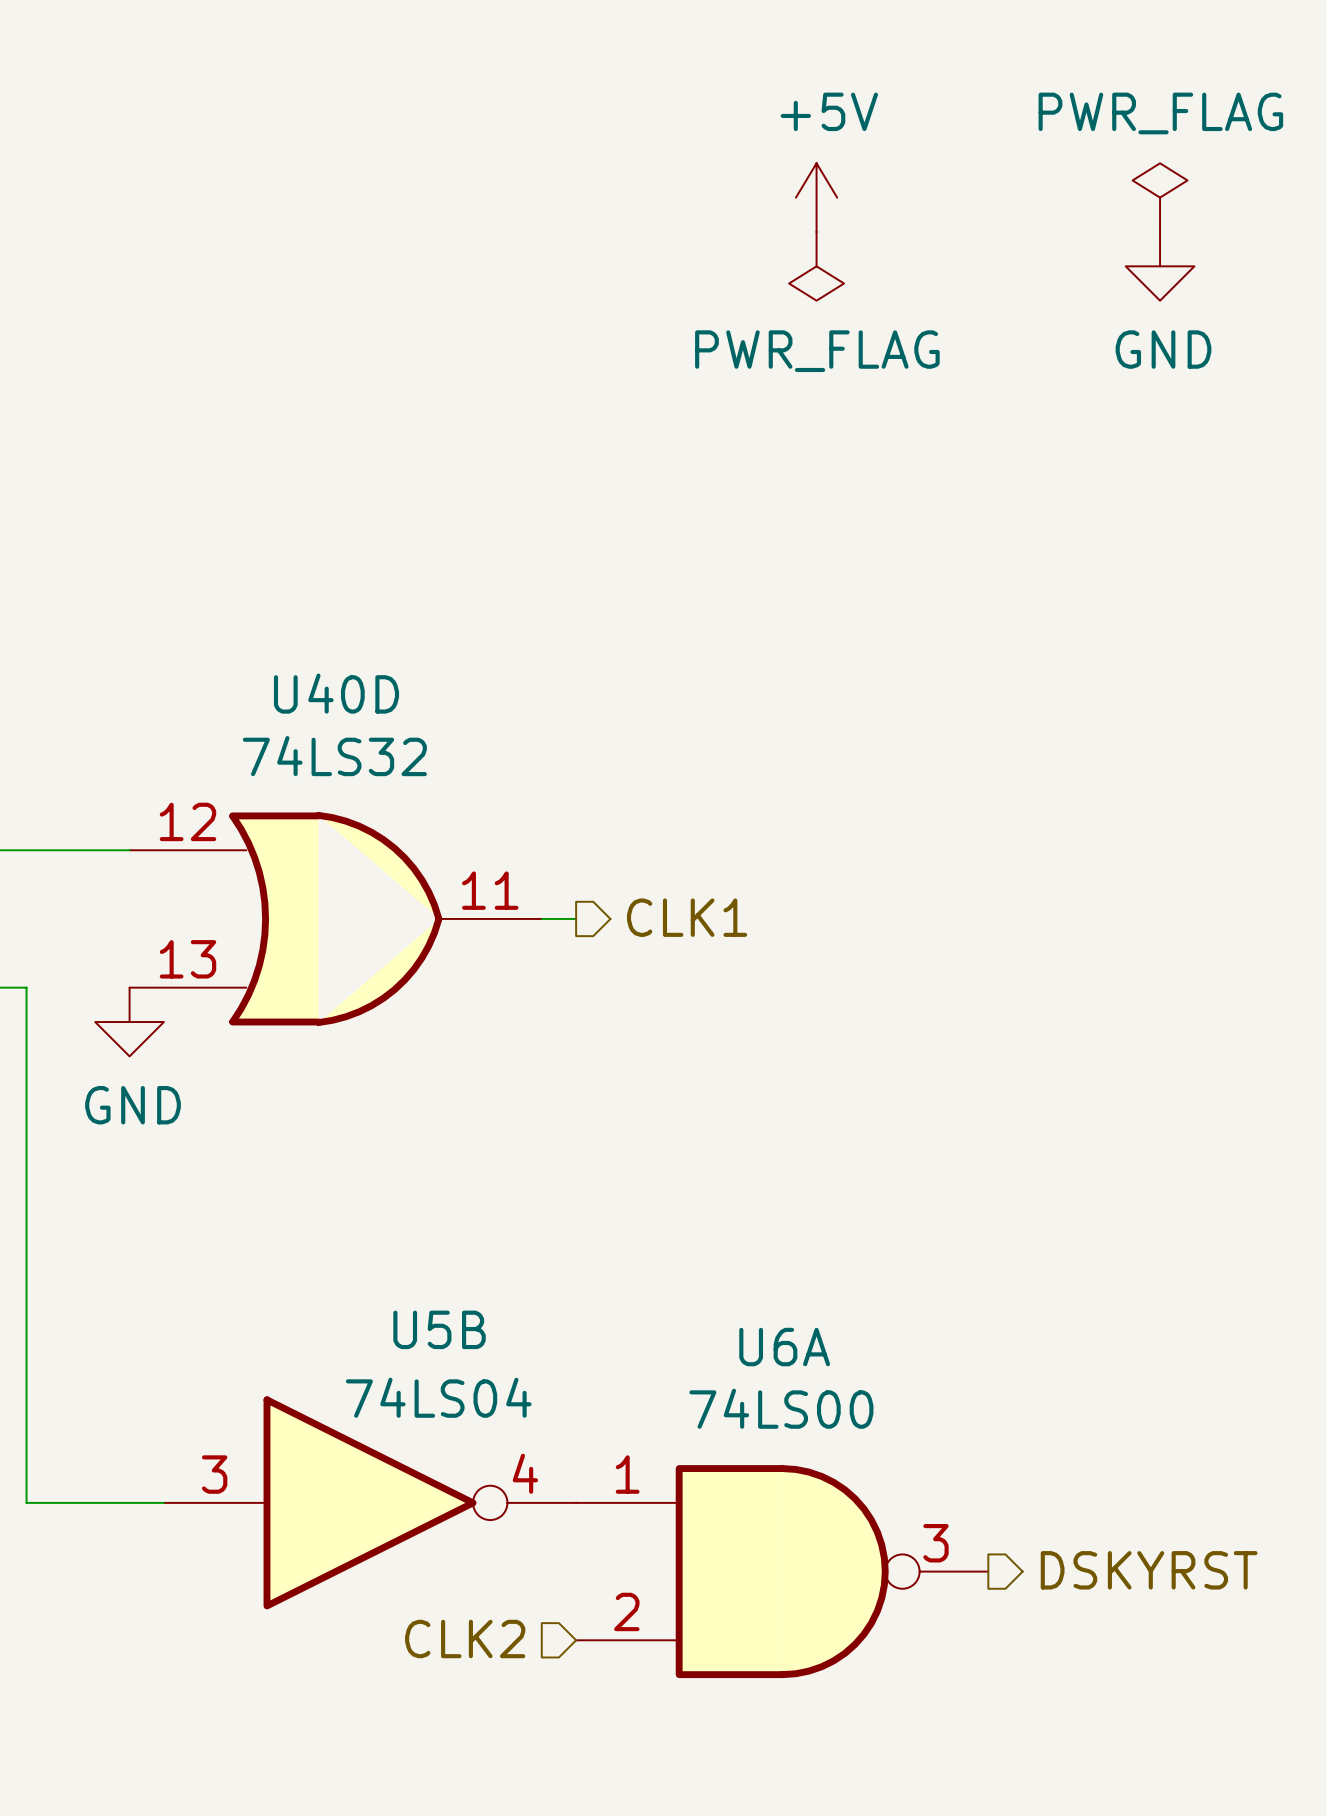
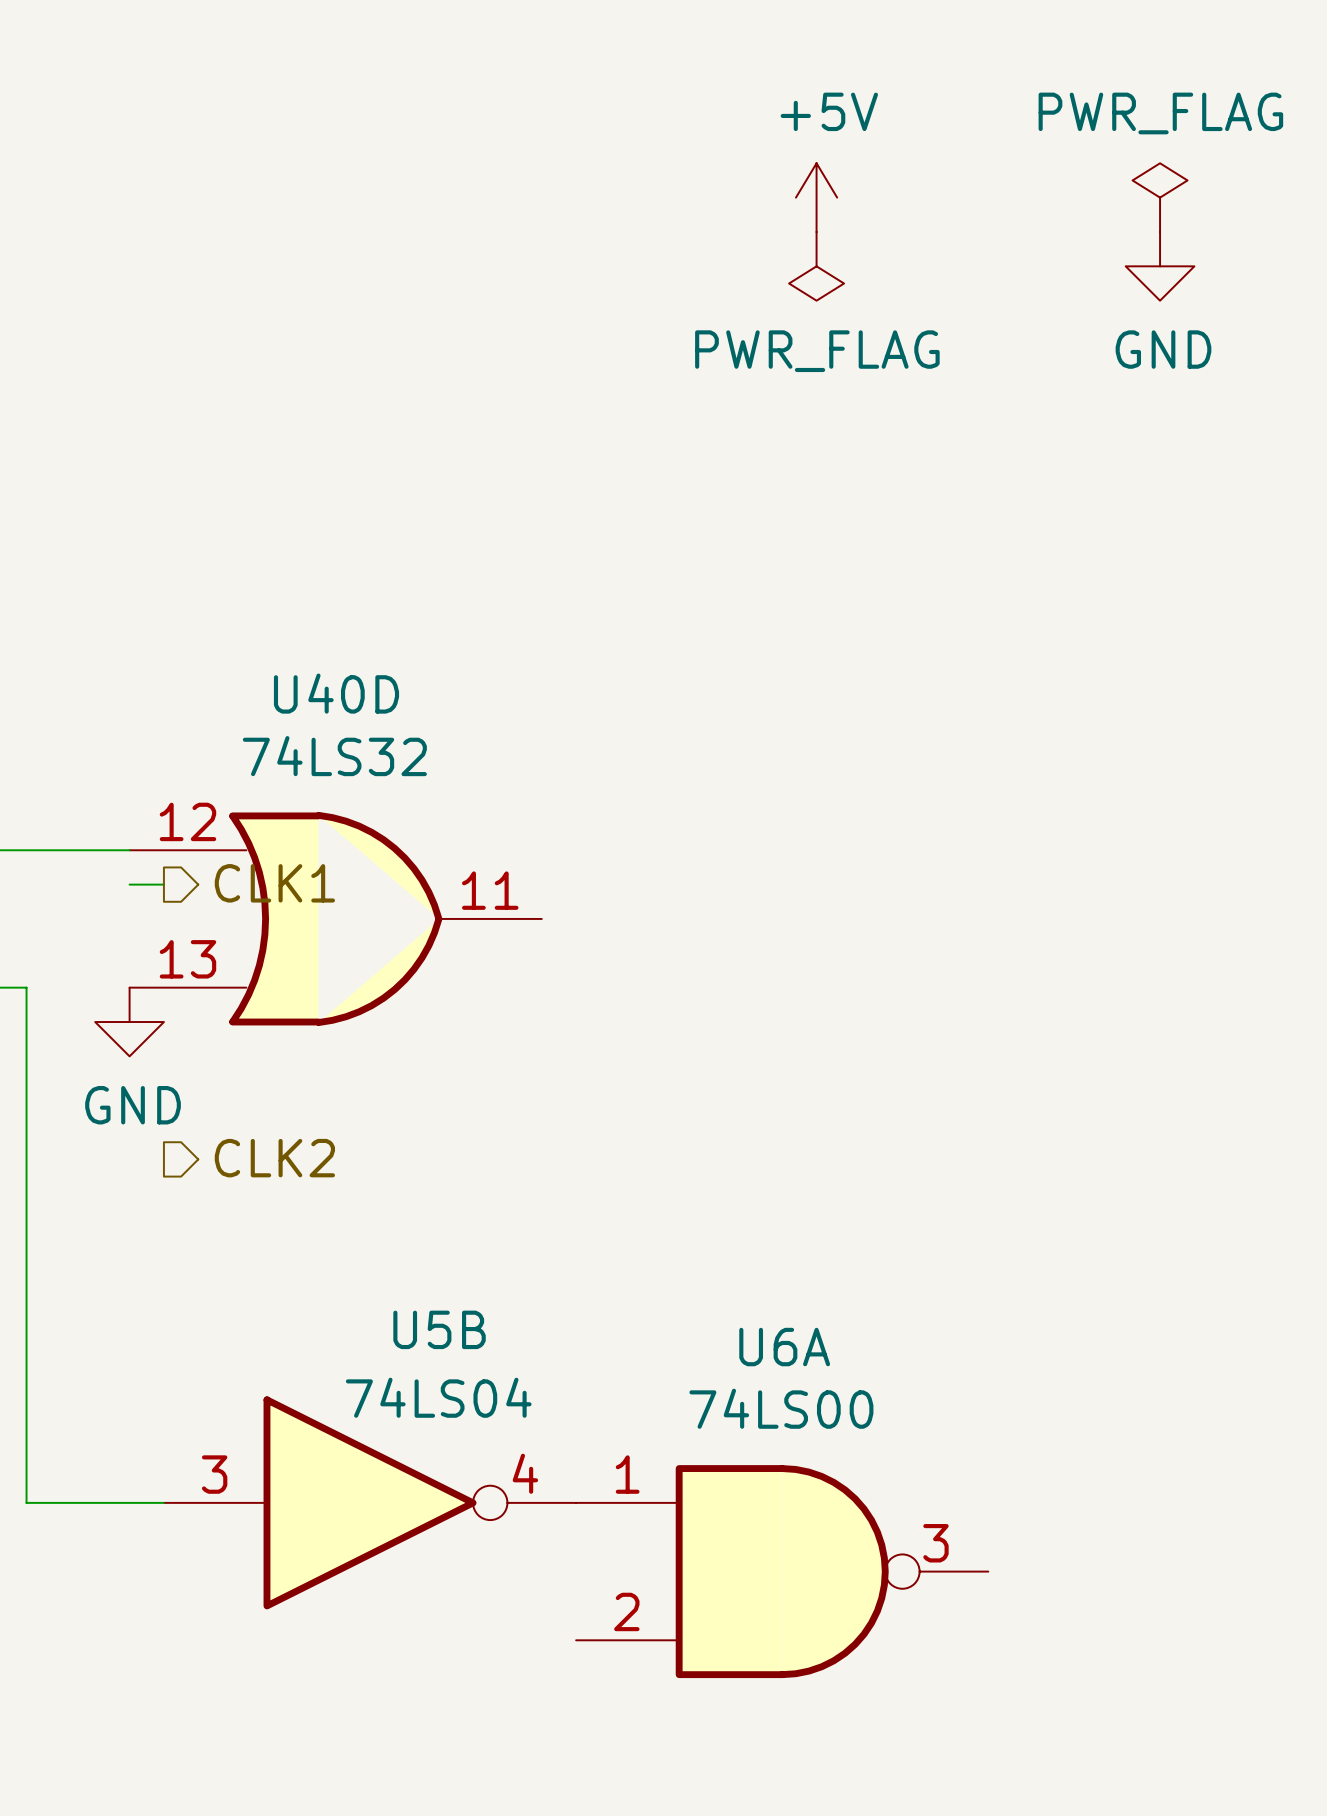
hierarchical label position: CLK1 (687, 917) -> CLK1 (274, 883)
wire: (541, 918) (576, 918) -> (129, 884) (163, 884)
hierarchical label: none -> CLK2 (274, 1158)
hierarchical label: DSKYRST (1149, 1570) -> none
hierarchical label: CLK2 (465, 1639) -> none

